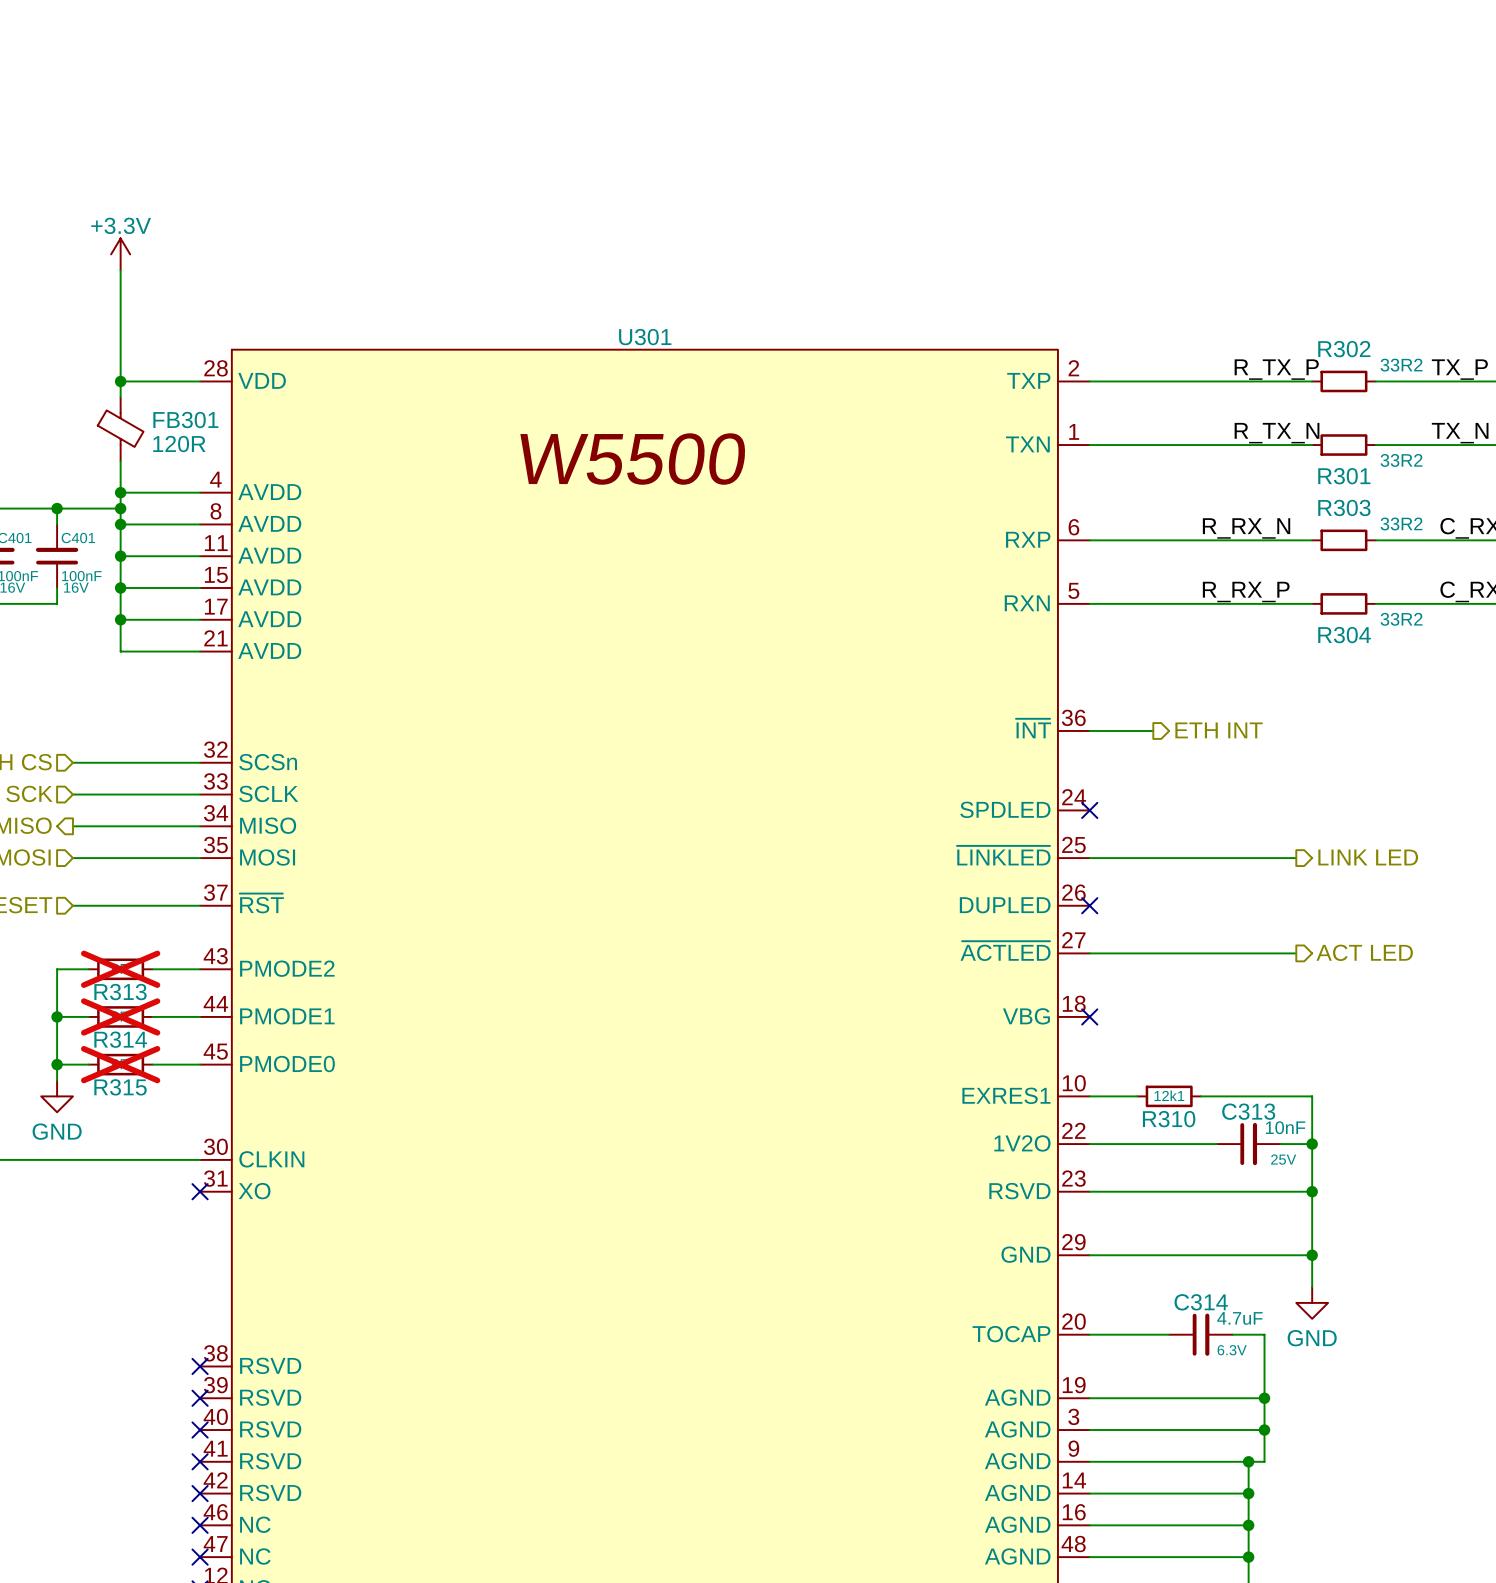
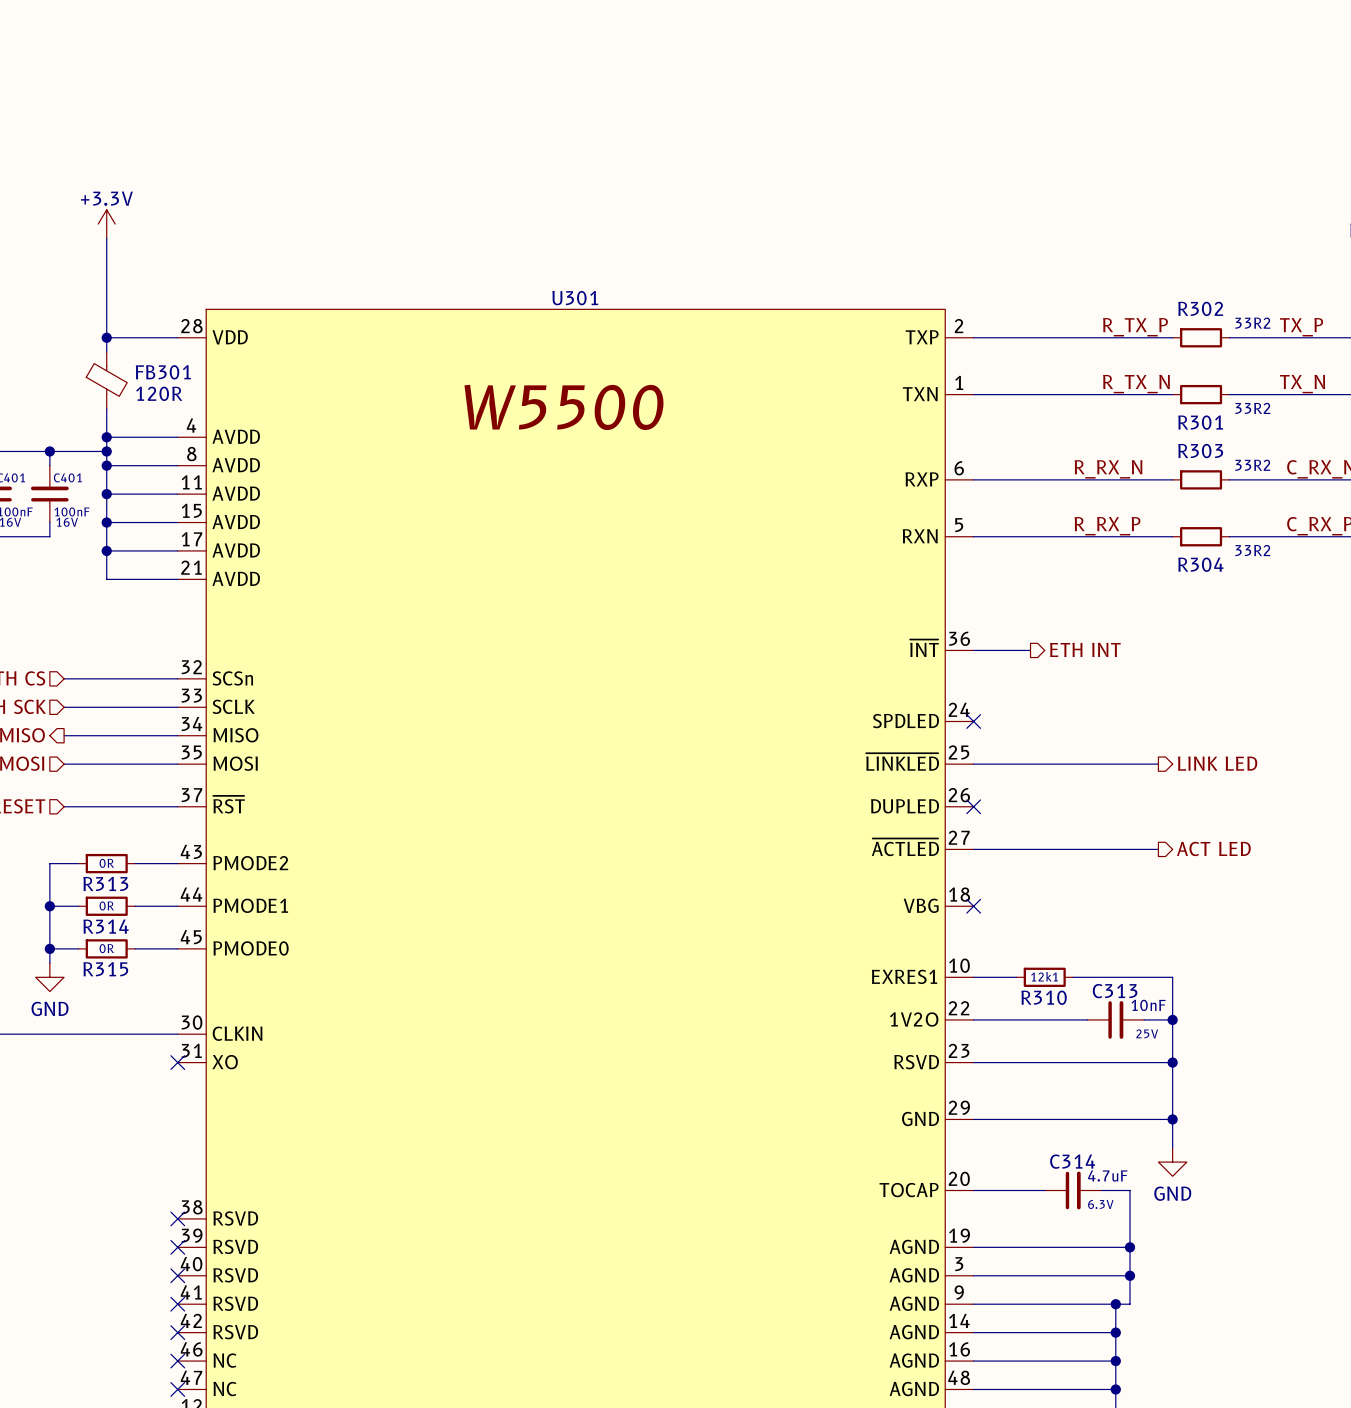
R313 do-not-place cross: (120, 969) -> none
R314 do-not-place cross: (120, 1016) -> none
R315 do-not-place cross: (120, 1064) -> none

